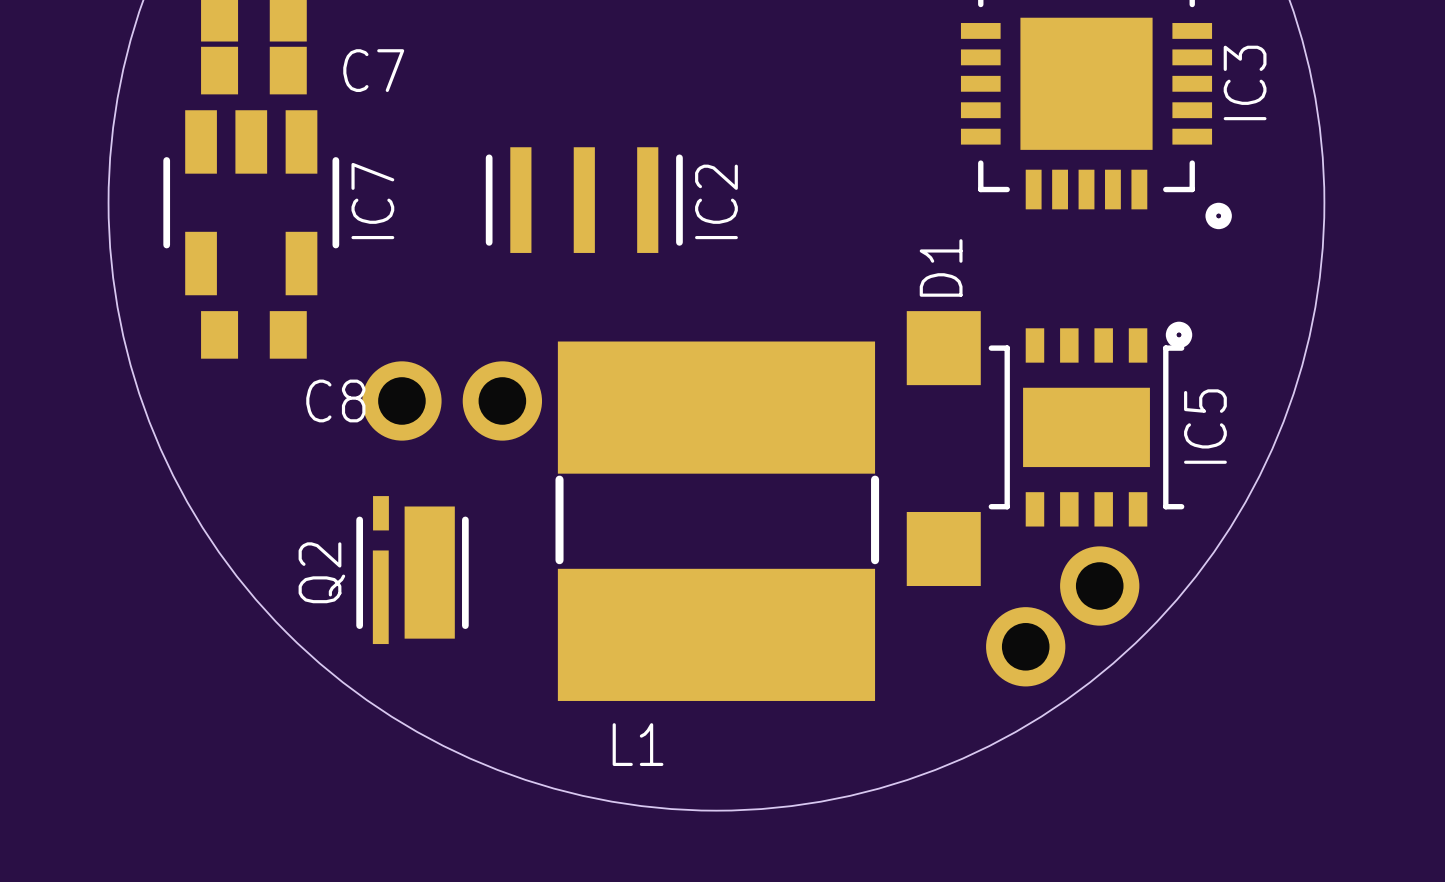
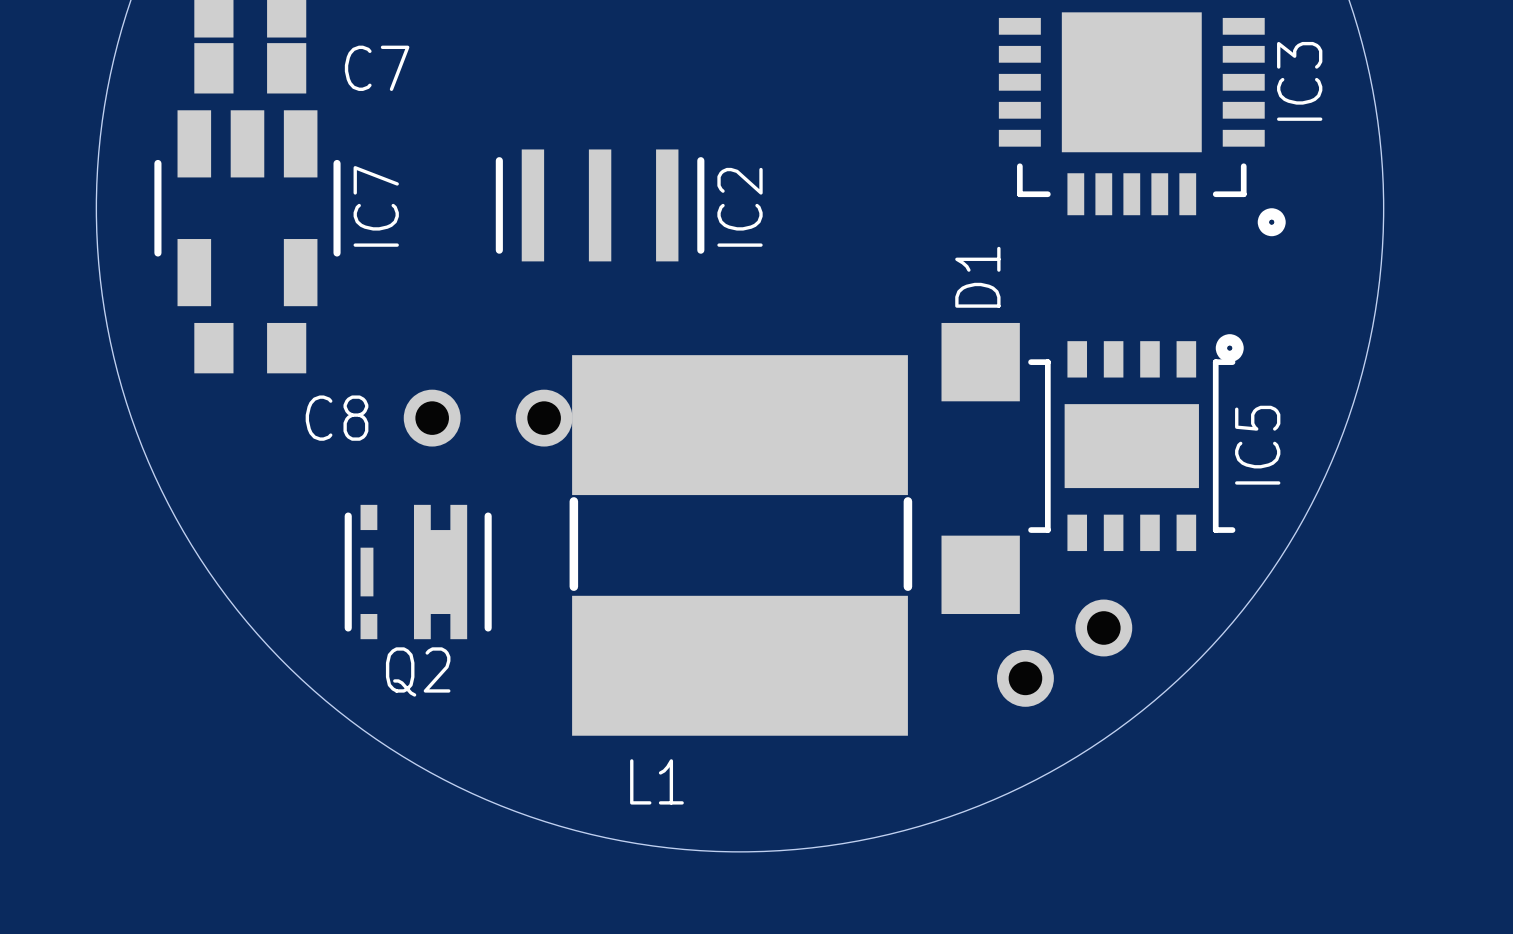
part footprint: [362, 361, 442, 441] -> [403, 389, 461, 447]
part footprint: [462, 361, 543, 441] -> [515, 389, 573, 447]
Q2 footprint: [356, 496, 469, 645] -> [344, 504, 492, 640]
Q2 name rotation: 0° (321, 572) -> 90° clockwise (418, 671)
Q2 name position: Q2 (321, 572) -> Q2 (418, 671)
part: (1099, 586) -> none
part: none -> (1103, 627)
part: none -> (1025, 678)
part: (1025, 646) -> none

